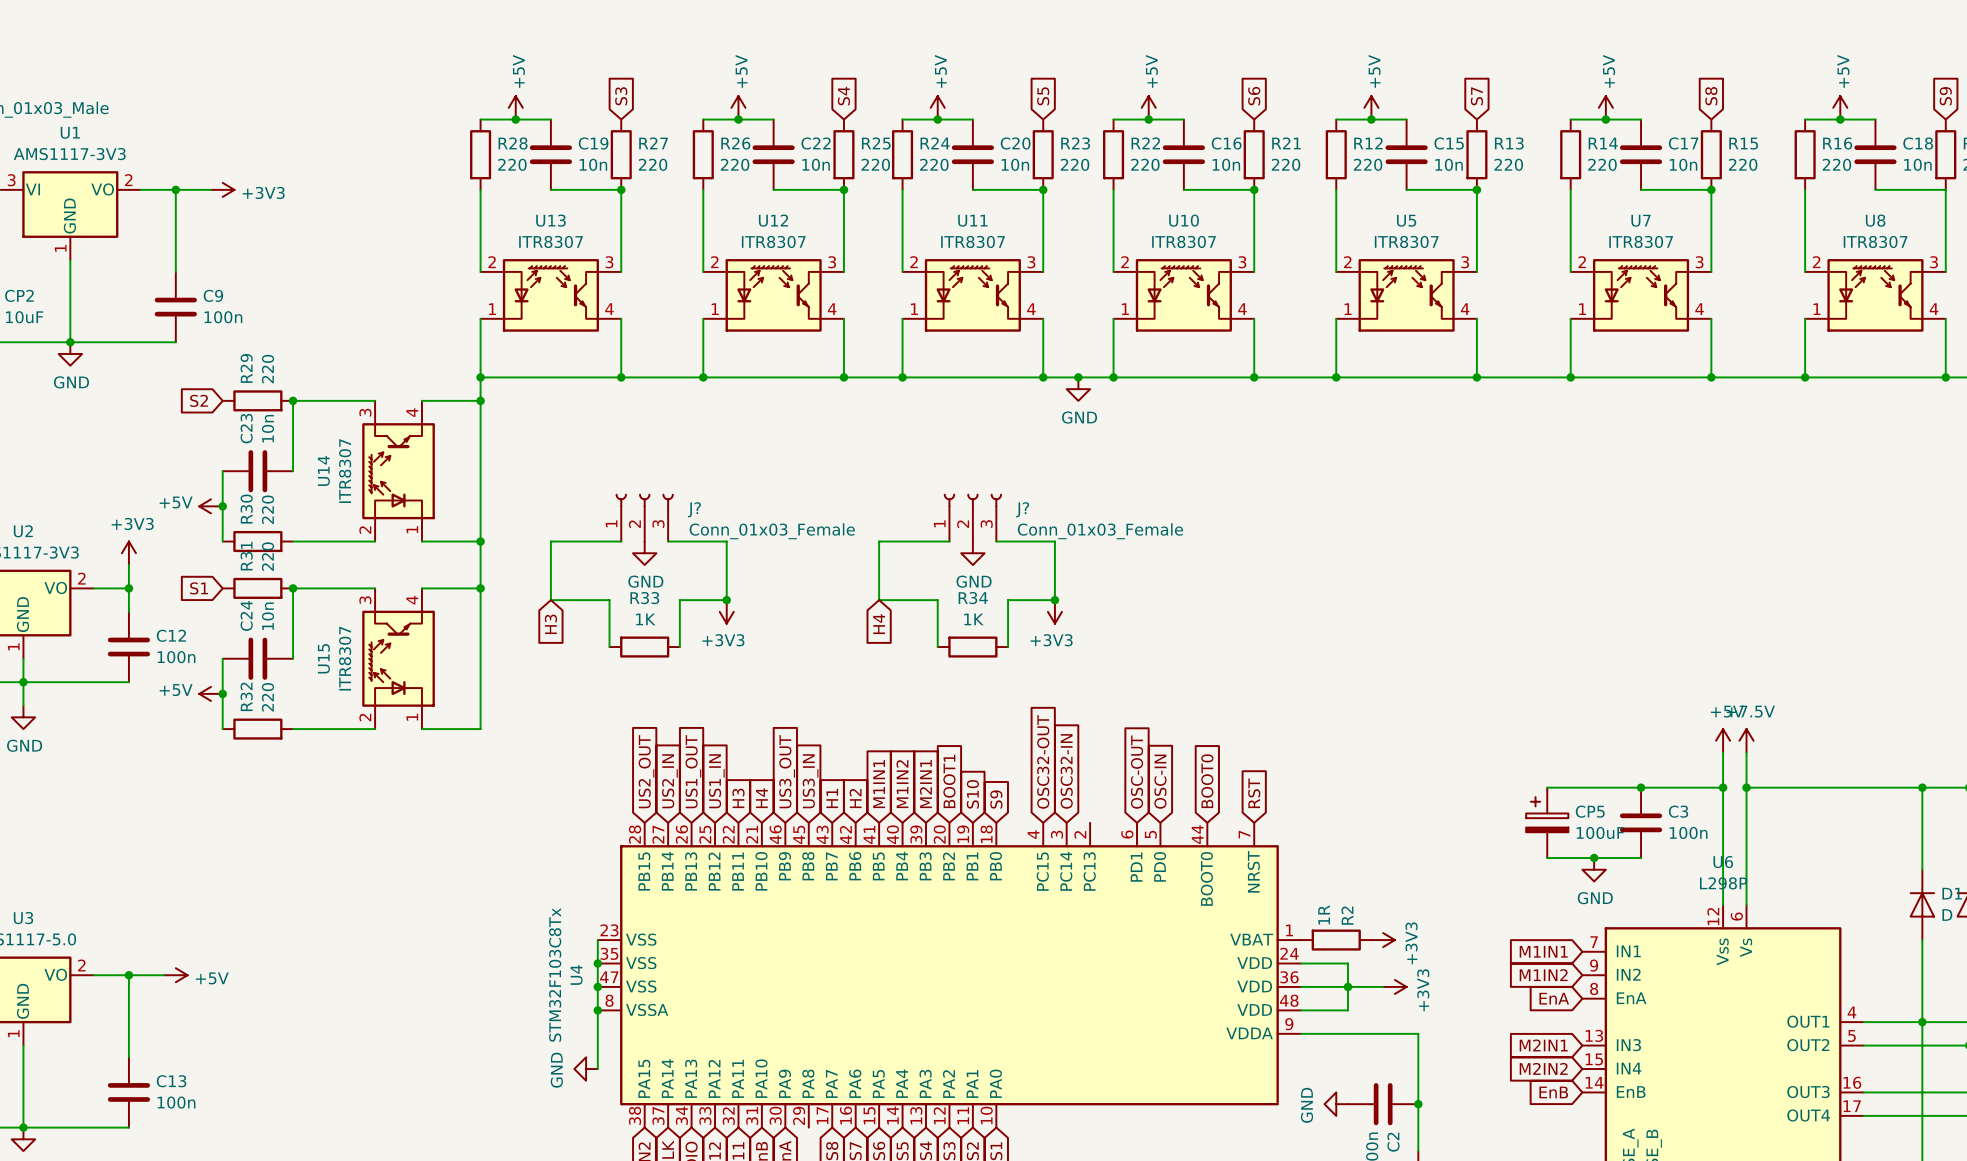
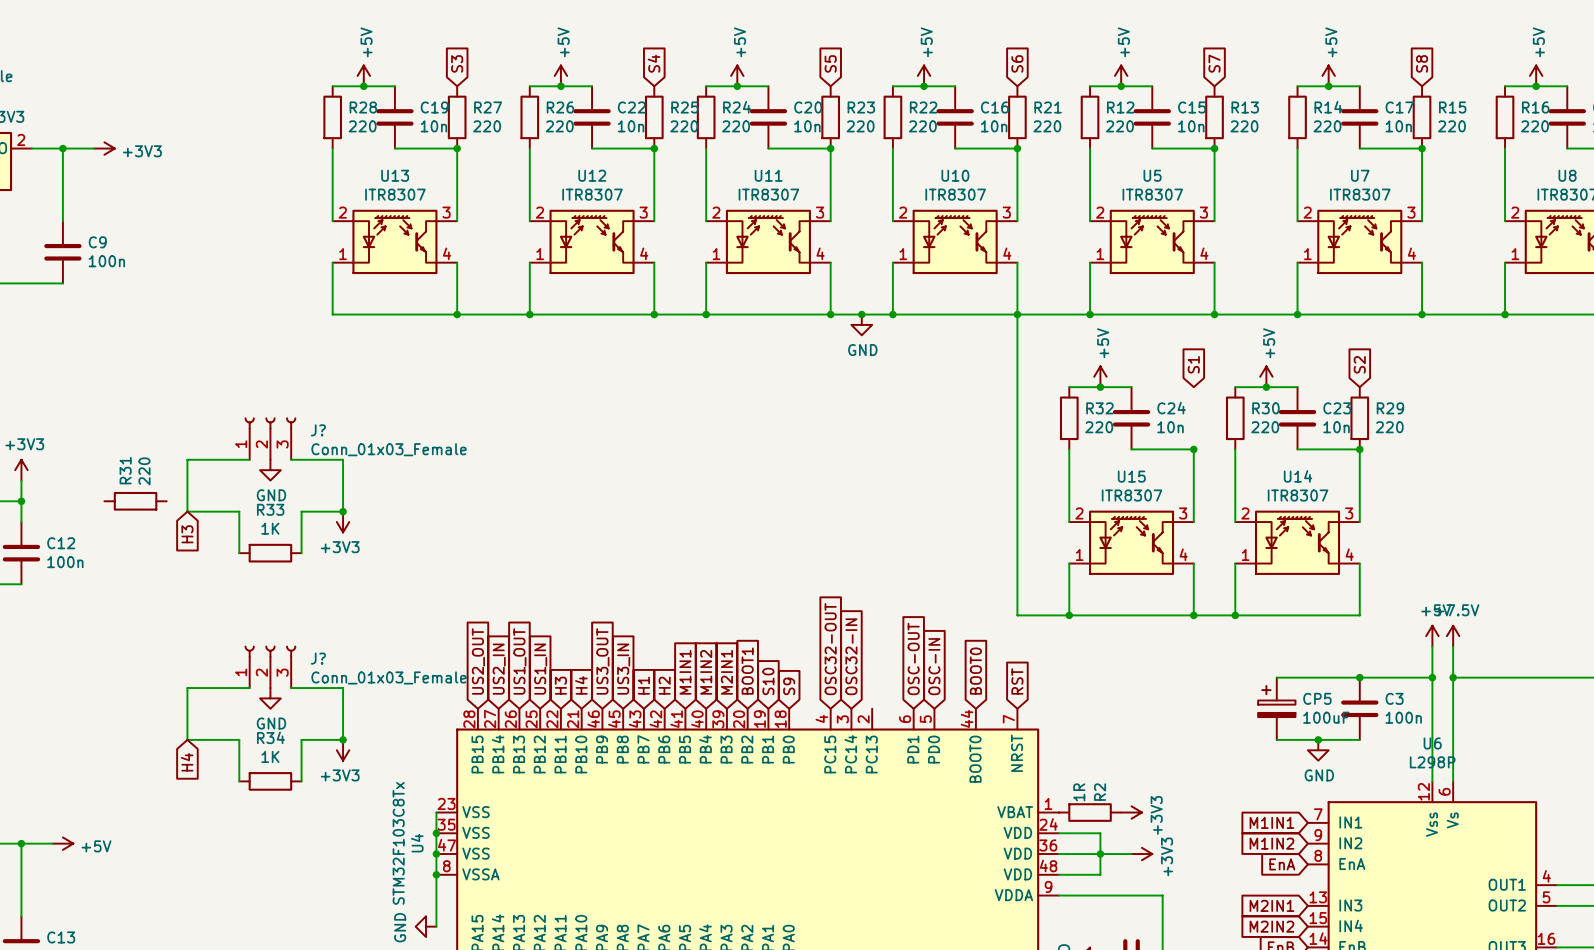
wire: (480, 377) (480, 729) (421, 729) -> none
junction: (480, 377) -> none
wire: none -> (1017, 314) (1017, 615) (1359, 615) (1359, 563)
global label: S2 (199, 400) -> none
R29 rotation: 0° (257, 400) -> 90° clockwise (1359, 418)
R29 position: (257, 400) -> (1359, 418)
junction: (293, 400) -> none
wire: (375, 400) (293, 400) (293, 471) -> none
wire: (421, 400) (480, 400) -> none
junction: (480, 400) -> none
global label: none -> S1 (1193, 364)
global label: none -> S2 (1359, 364)
power symbol: none -> +5V (1100, 376)
power symbol: none -> +5V (1266, 376)
wire: none -> (1069, 387) (1131, 387)
junction: none -> (1100, 387)
wire: none -> (1235, 387) (1297, 387)
junction: none -> (1266, 387)
wire: (222, 471) (222, 541) -> none
C23 rotation: 0° (257, 471) -> 90° clockwise (1297, 418)
C23 position: (257, 471) -> (1297, 418)
U14 rotation: 0° (398, 471) -> 90° clockwise (1297, 542)
U14 position: (398, 471) -> (1297, 542)
power symbol: +5V (210, 506) -> none
junction: (222, 506) -> none
J?: none -> Conn_01x03_Female (270, 438)
J?: Conn_01x03_Female (644, 517) -> none
J?: Conn_01x03_Female (972, 517) -> none
wire: none -> (1069, 449) (1069, 522)
wire: none -> (1131, 449) (1193, 449) (1193, 522)
junction: none -> (1193, 449)
wire: none -> (1235, 449) (1235, 522)
wire: none -> (1297, 449) (1359, 449) (1359, 522)
junction: none -> (1359, 449)
R30 rotation: 0° (257, 541) -> 90° clockwise (1235, 418)
R30 position: (257, 541) -> (1235, 418)
wire: (293, 541) (316, 541) -> (239, 553) (239, 511) (187, 511) (187, 459)
wire: (421, 541) (433, 541) -> (239, 459) (249, 459)
wire: none -> (332, 459) (343, 459) (343, 511) (301, 511) (301, 553)
junction: (480, 541) -> none
wire: (621, 541) (550, 541) (550, 600) (609, 600) (609, 647) -> none
wire: (668, 541) (726, 541) (726, 600) (679, 600) (679, 647) -> none
wire: (949, 541) (879, 541) (879, 600) (937, 600) (937, 647) -> none
wire: (996, 541) (1054, 541) (1054, 600) (1008, 600) (1008, 647) -> none
power symbol: none -> GND (270, 470)
power symbol: GND (644, 553) -> none
power symbol: GND (972, 553) -> none
global label: S1 (199, 588) -> none
junction: (293, 588) -> none
wire: (375, 588) (293, 588) (293, 658) -> none
wire: (421, 588) (480, 588) -> none
junction position: (480, 588) -> (343, 511)
junction: (726, 600) -> none
junction: (1054, 600) -> none
power symbol: none -> +3V3 (343, 522)
power symbol: +3V3 (726, 611) -> none
power symbol: +3V3 (1054, 611) -> none
global label: none -> H3 (187, 534)
global label: H3 (550, 624) -> none
global label: H4 (879, 624) -> none
R33 position: (644, 647) -> (270, 553)
R34 position: (972, 647) -> (270, 781)
wire: (222, 658) (222, 729) -> none
C24 rotation: 0° (257, 658) -> 90° clockwise (1131, 418)
C24 position: (257, 658) -> (1131, 418)
U15 rotation: 0° (398, 658) -> 90° clockwise (1131, 542)
U15 position: (398, 658) -> (1131, 542)
wire: none -> (1069, 563) (1069, 615)
wire: none -> (1193, 563) (1193, 615)
wire: none -> (1235, 563) (1235, 615)
power symbol: +5V (210, 693) -> none
junction: (222, 693) -> none
junction: none -> (1069, 615)
junction: none -> (1193, 615)
junction: none -> (1235, 615)
R32 rotation: 0° (257, 729) -> 90° clockwise (1069, 418)
R32 position: (257, 729) -> (1069, 418)
wire: (293, 729) (375, 729) -> none
J?: none -> Conn_01x03_Female (270, 666)
wire: none -> (249, 688) (187, 688) (187, 739) (239, 739) (239, 781)
wire: none -> (291, 688) (343, 688) (343, 739) (301, 739) (301, 781)
power symbol: none -> GND (270, 698)
junction: none -> (343, 739)
power symbol: none -> +3V3 (343, 750)
global label: none -> H4 (187, 762)

